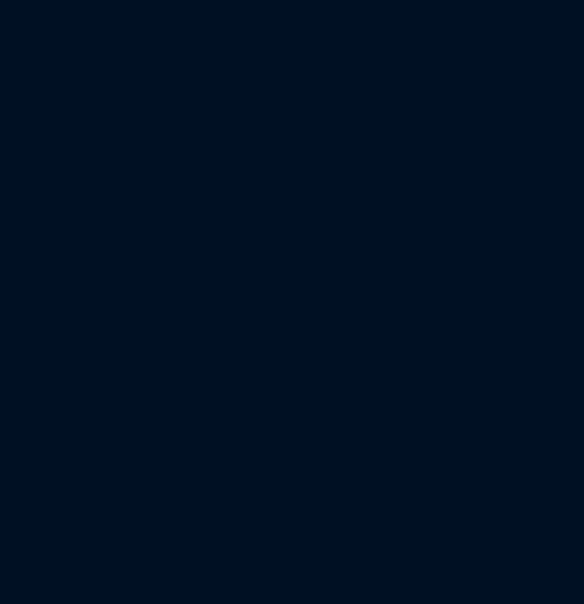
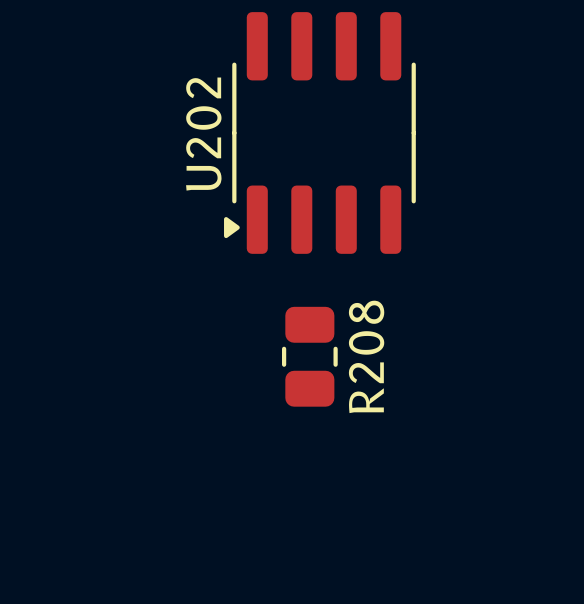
U202: none -> (319, 132)
R208: none -> (309, 356)

